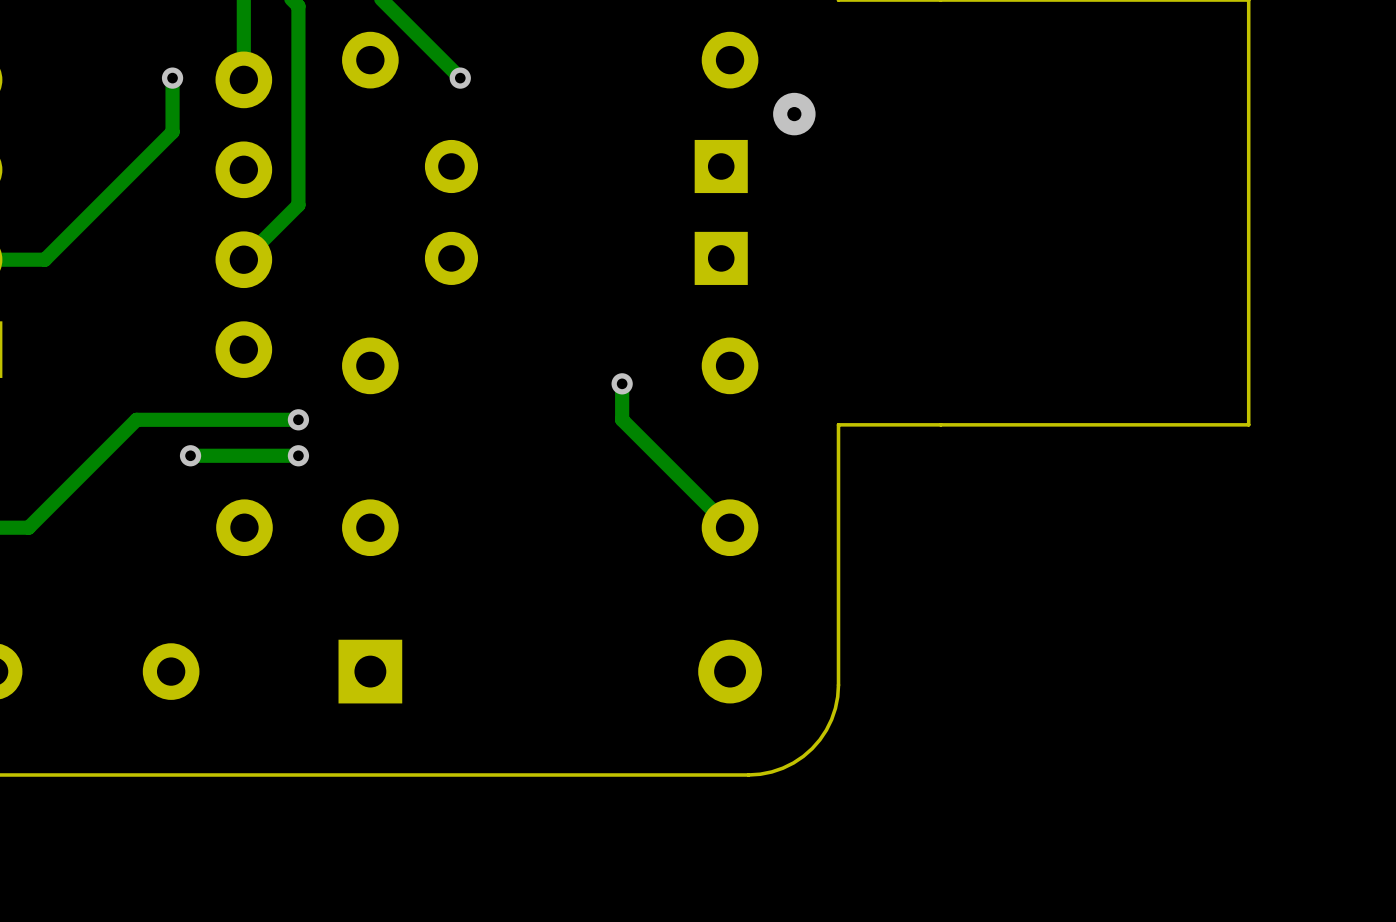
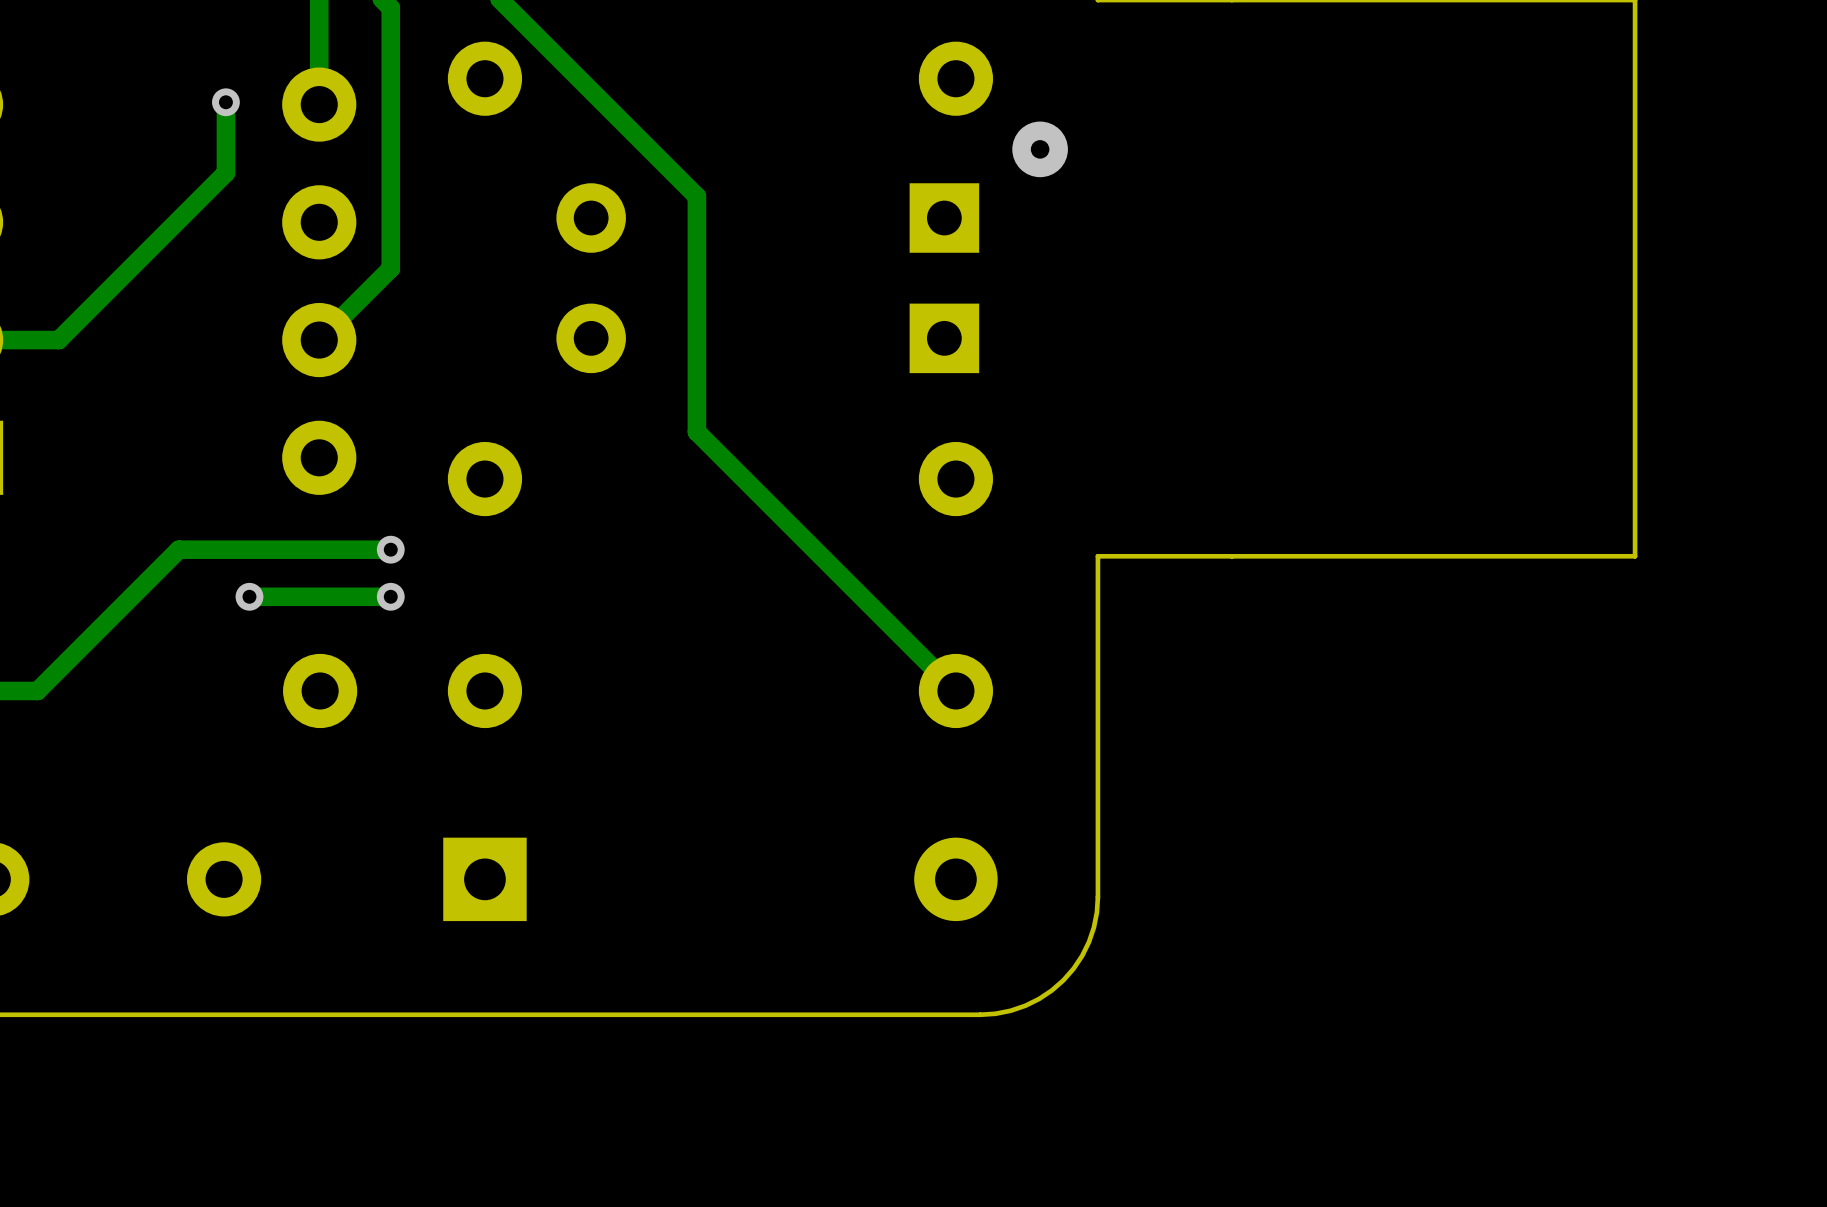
via: (460, 78) -> none
track: (622, 383) (622, 419) -> (602, 102) (696, 196) (696, 431) (814, 549)
via: (622, 383) -> none

